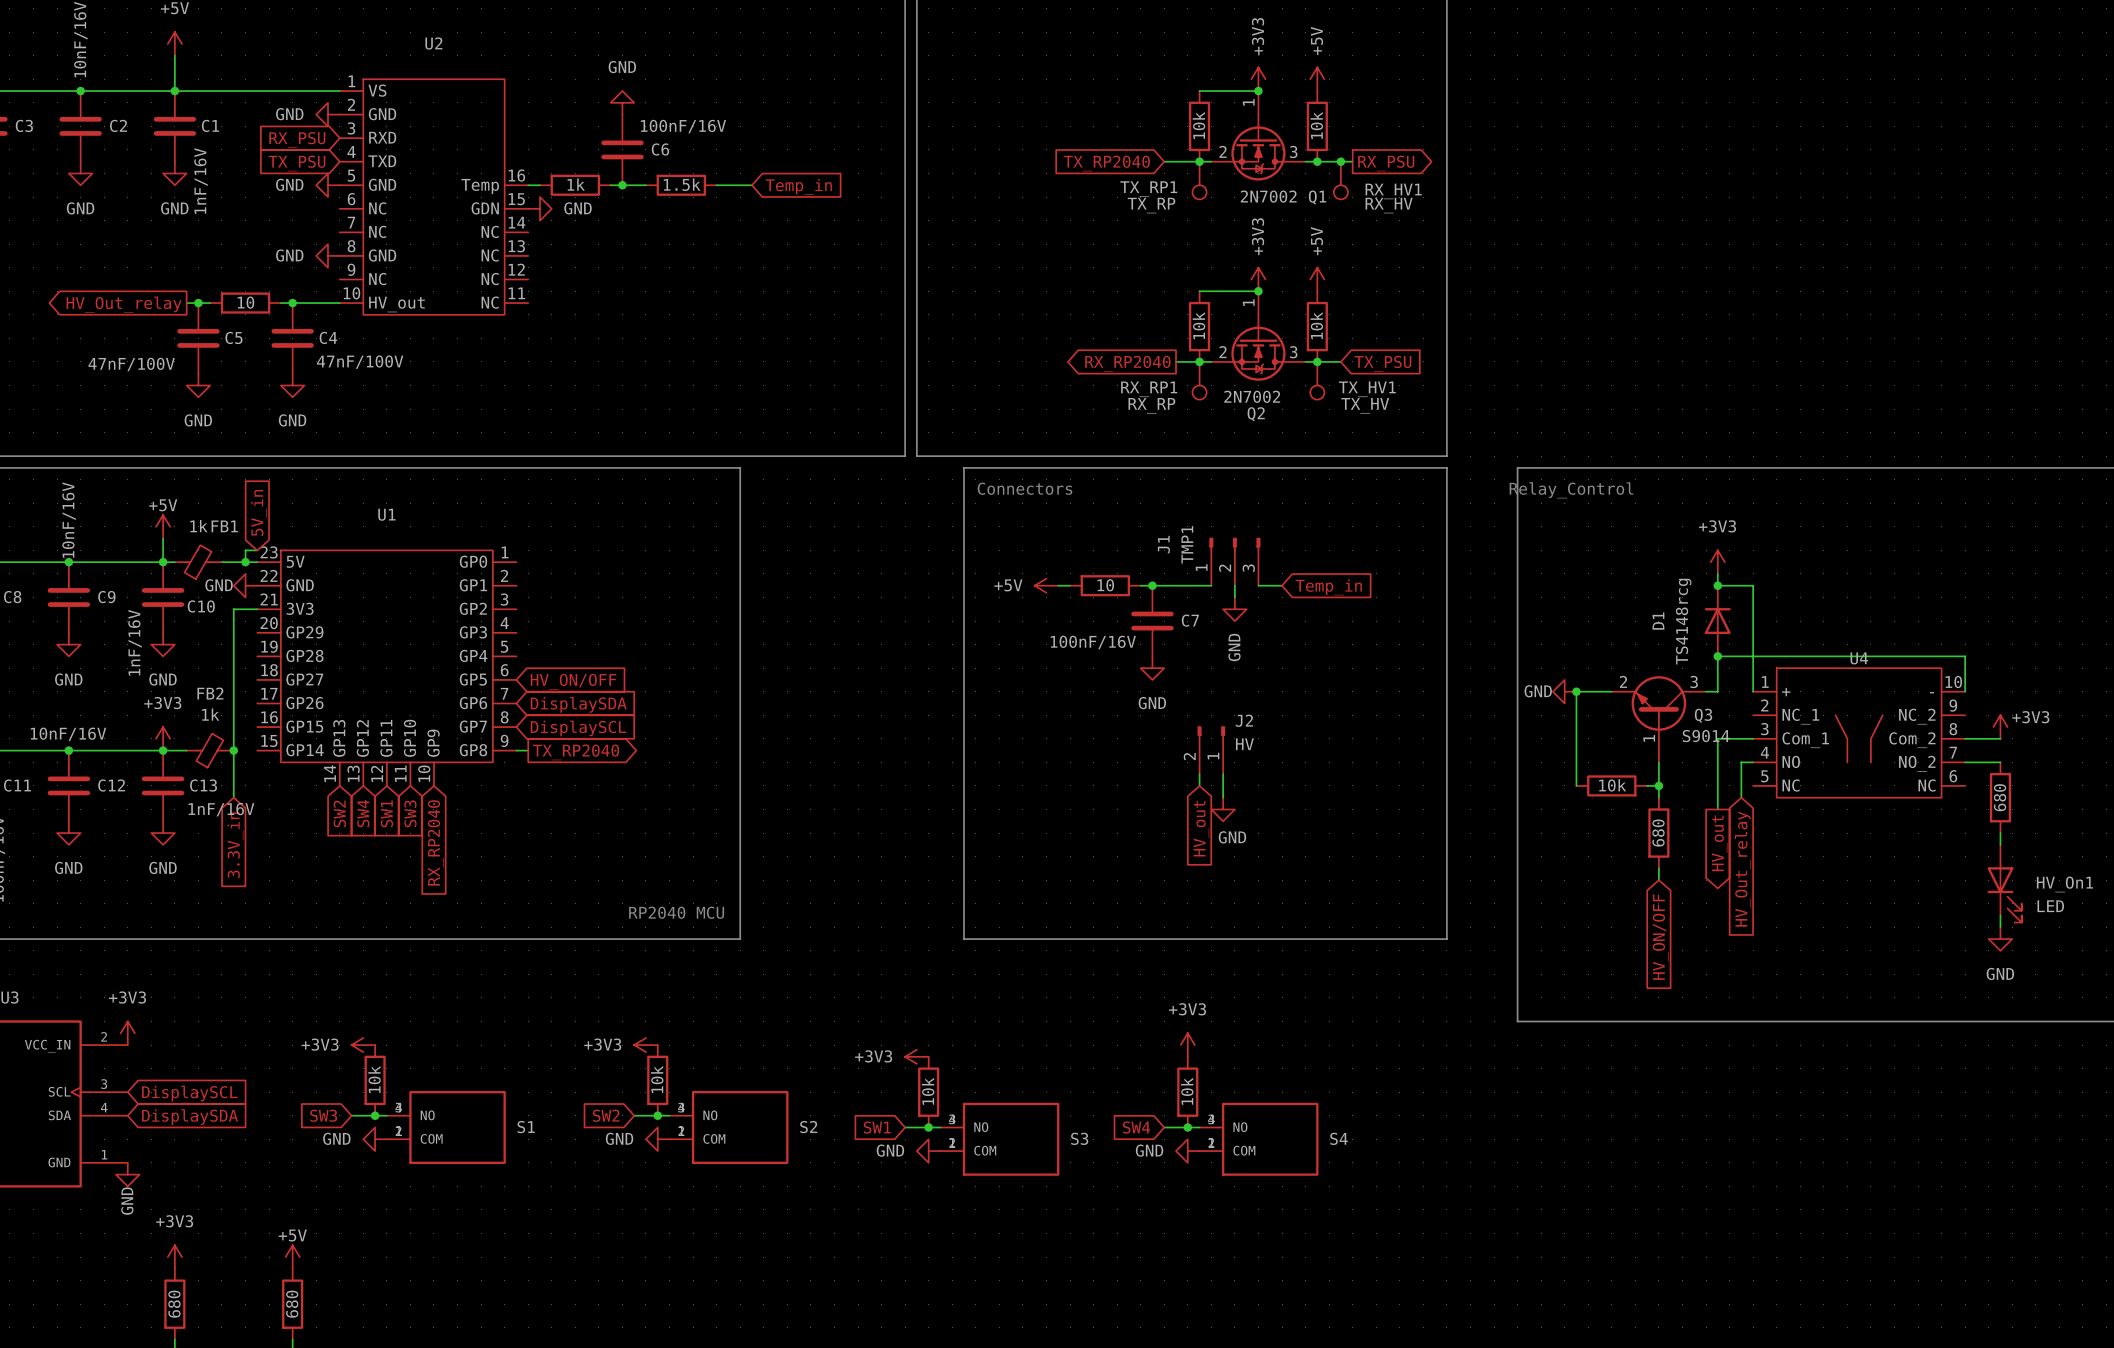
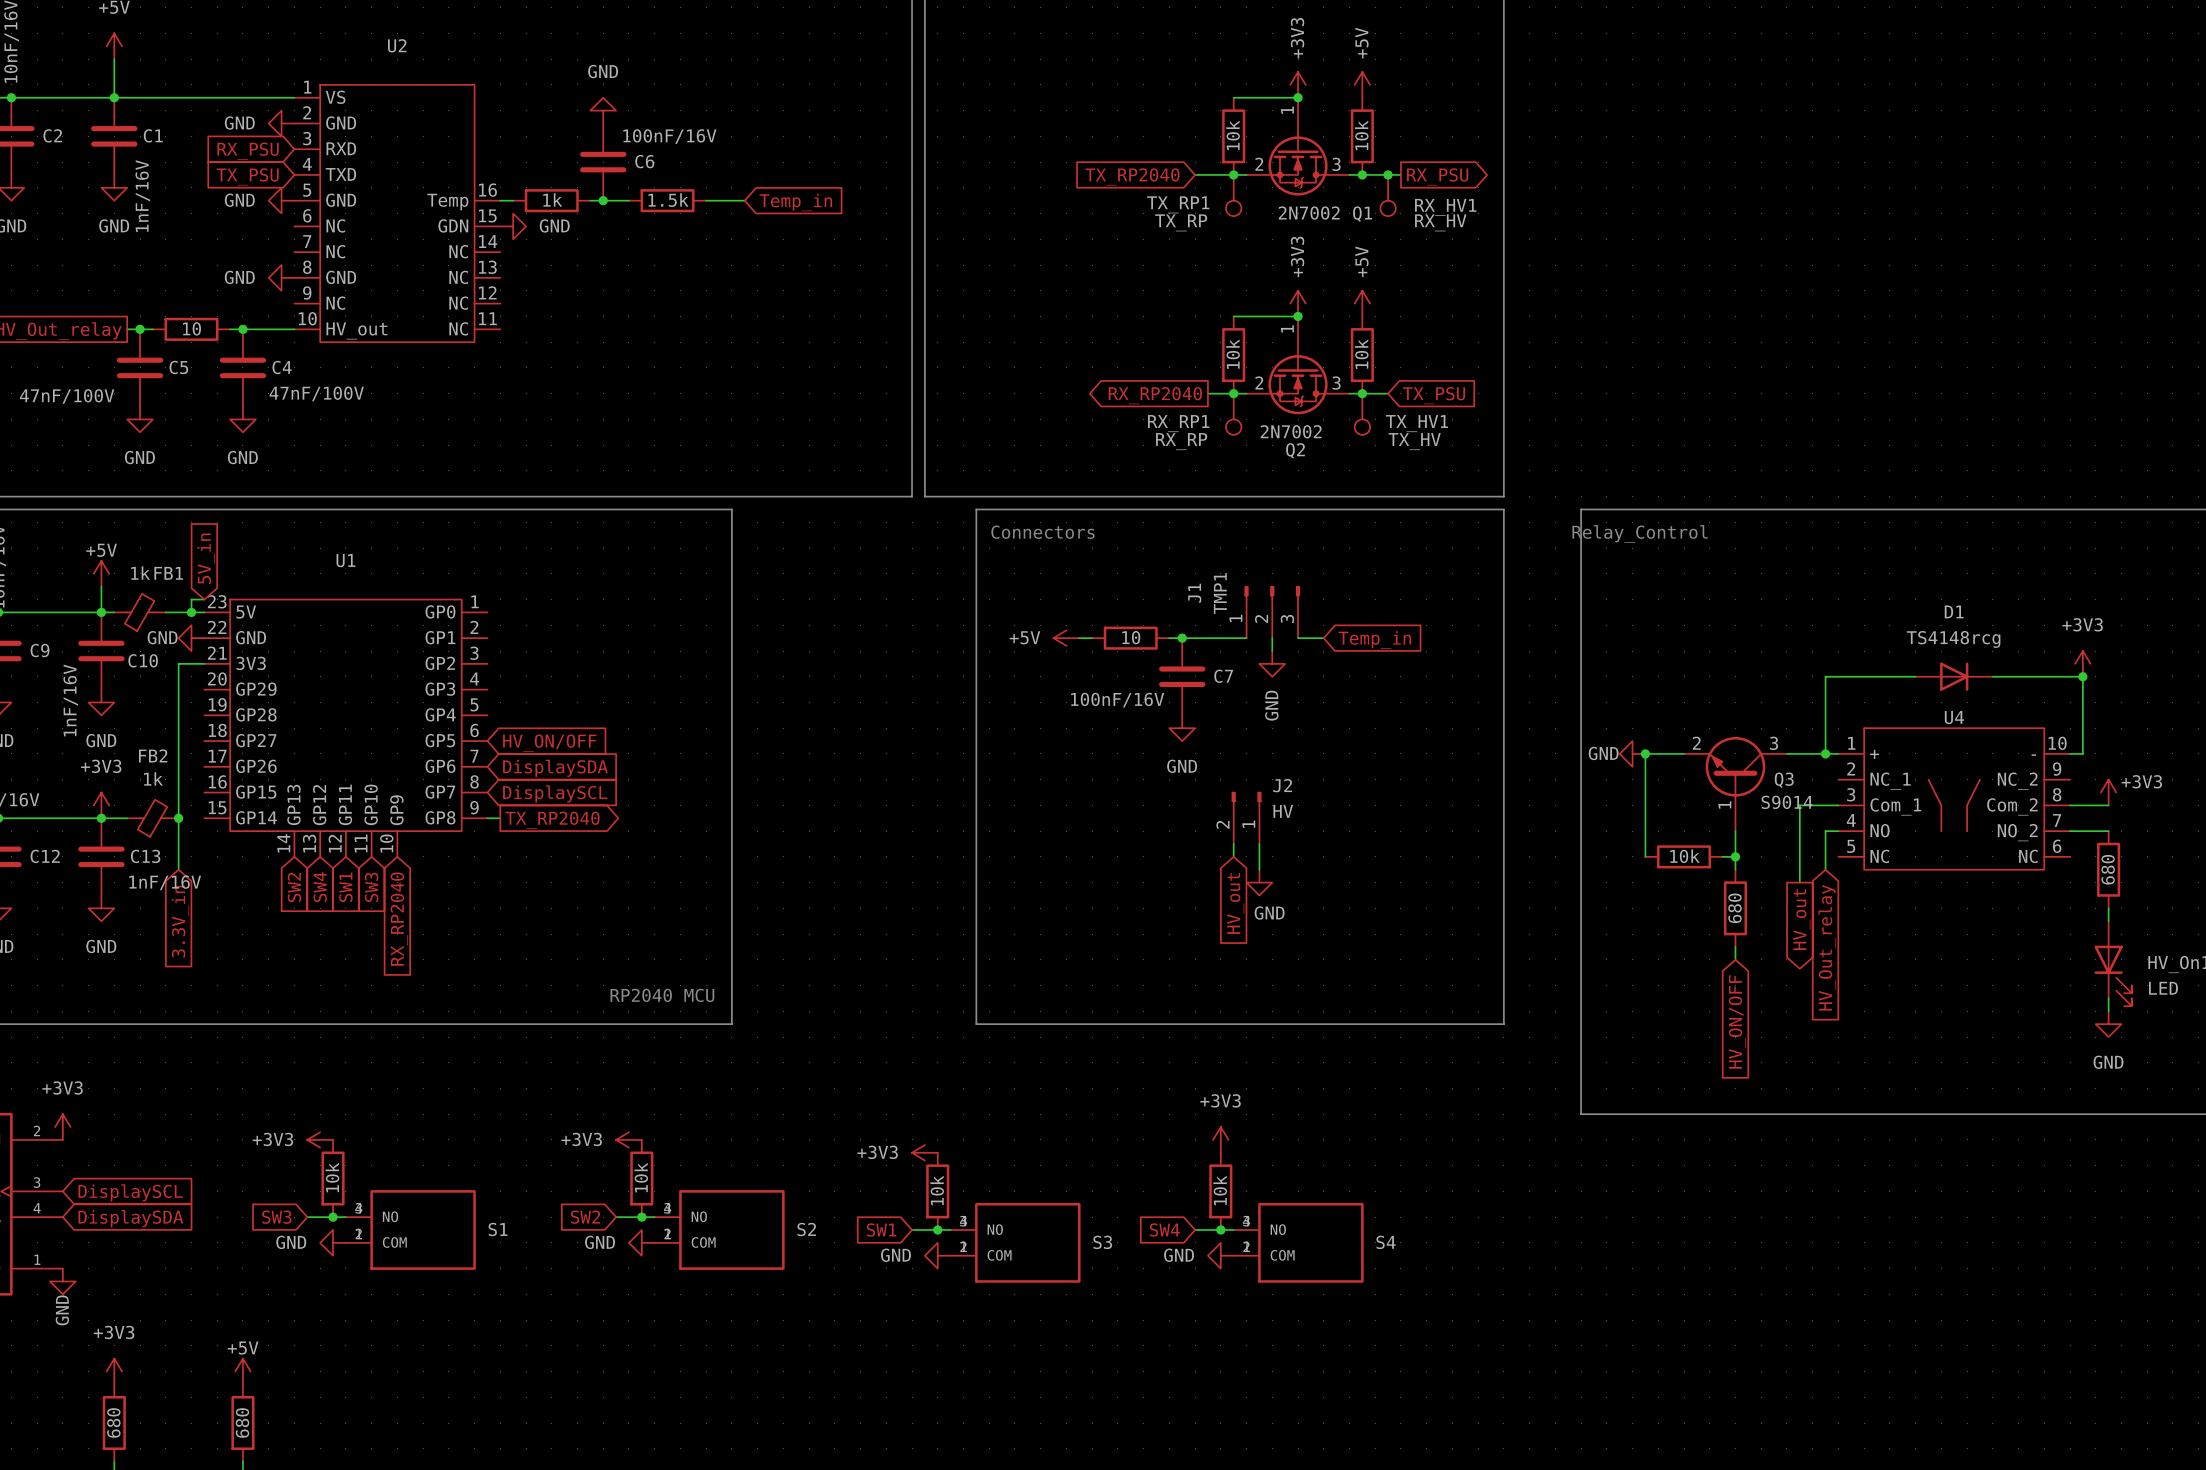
power symbol: +3V3 (1717, 562) -> none
wire: (1717, 573) (1717, 585) (1753, 585) (1753, 691) -> (1799, 753) (1838, 753)
junction: (1717, 585) -> none
power symbol: none -> +3V3 (2082, 663)
D1 rotation: 0° (1717, 621) -> 90° clockwise (1954, 676)
D1 position: (1717, 621) -> (1954, 676)
wire: none -> (1915, 676) (1825, 676) (1825, 753)
junction: none -> (2082, 676)
junction position: (1717, 656) -> (1825, 753)
wire: (1717, 691) (1717, 656) (1965, 656) (1965, 691) -> (1992, 676) (2082, 676) (2082, 753) (2070, 753)

